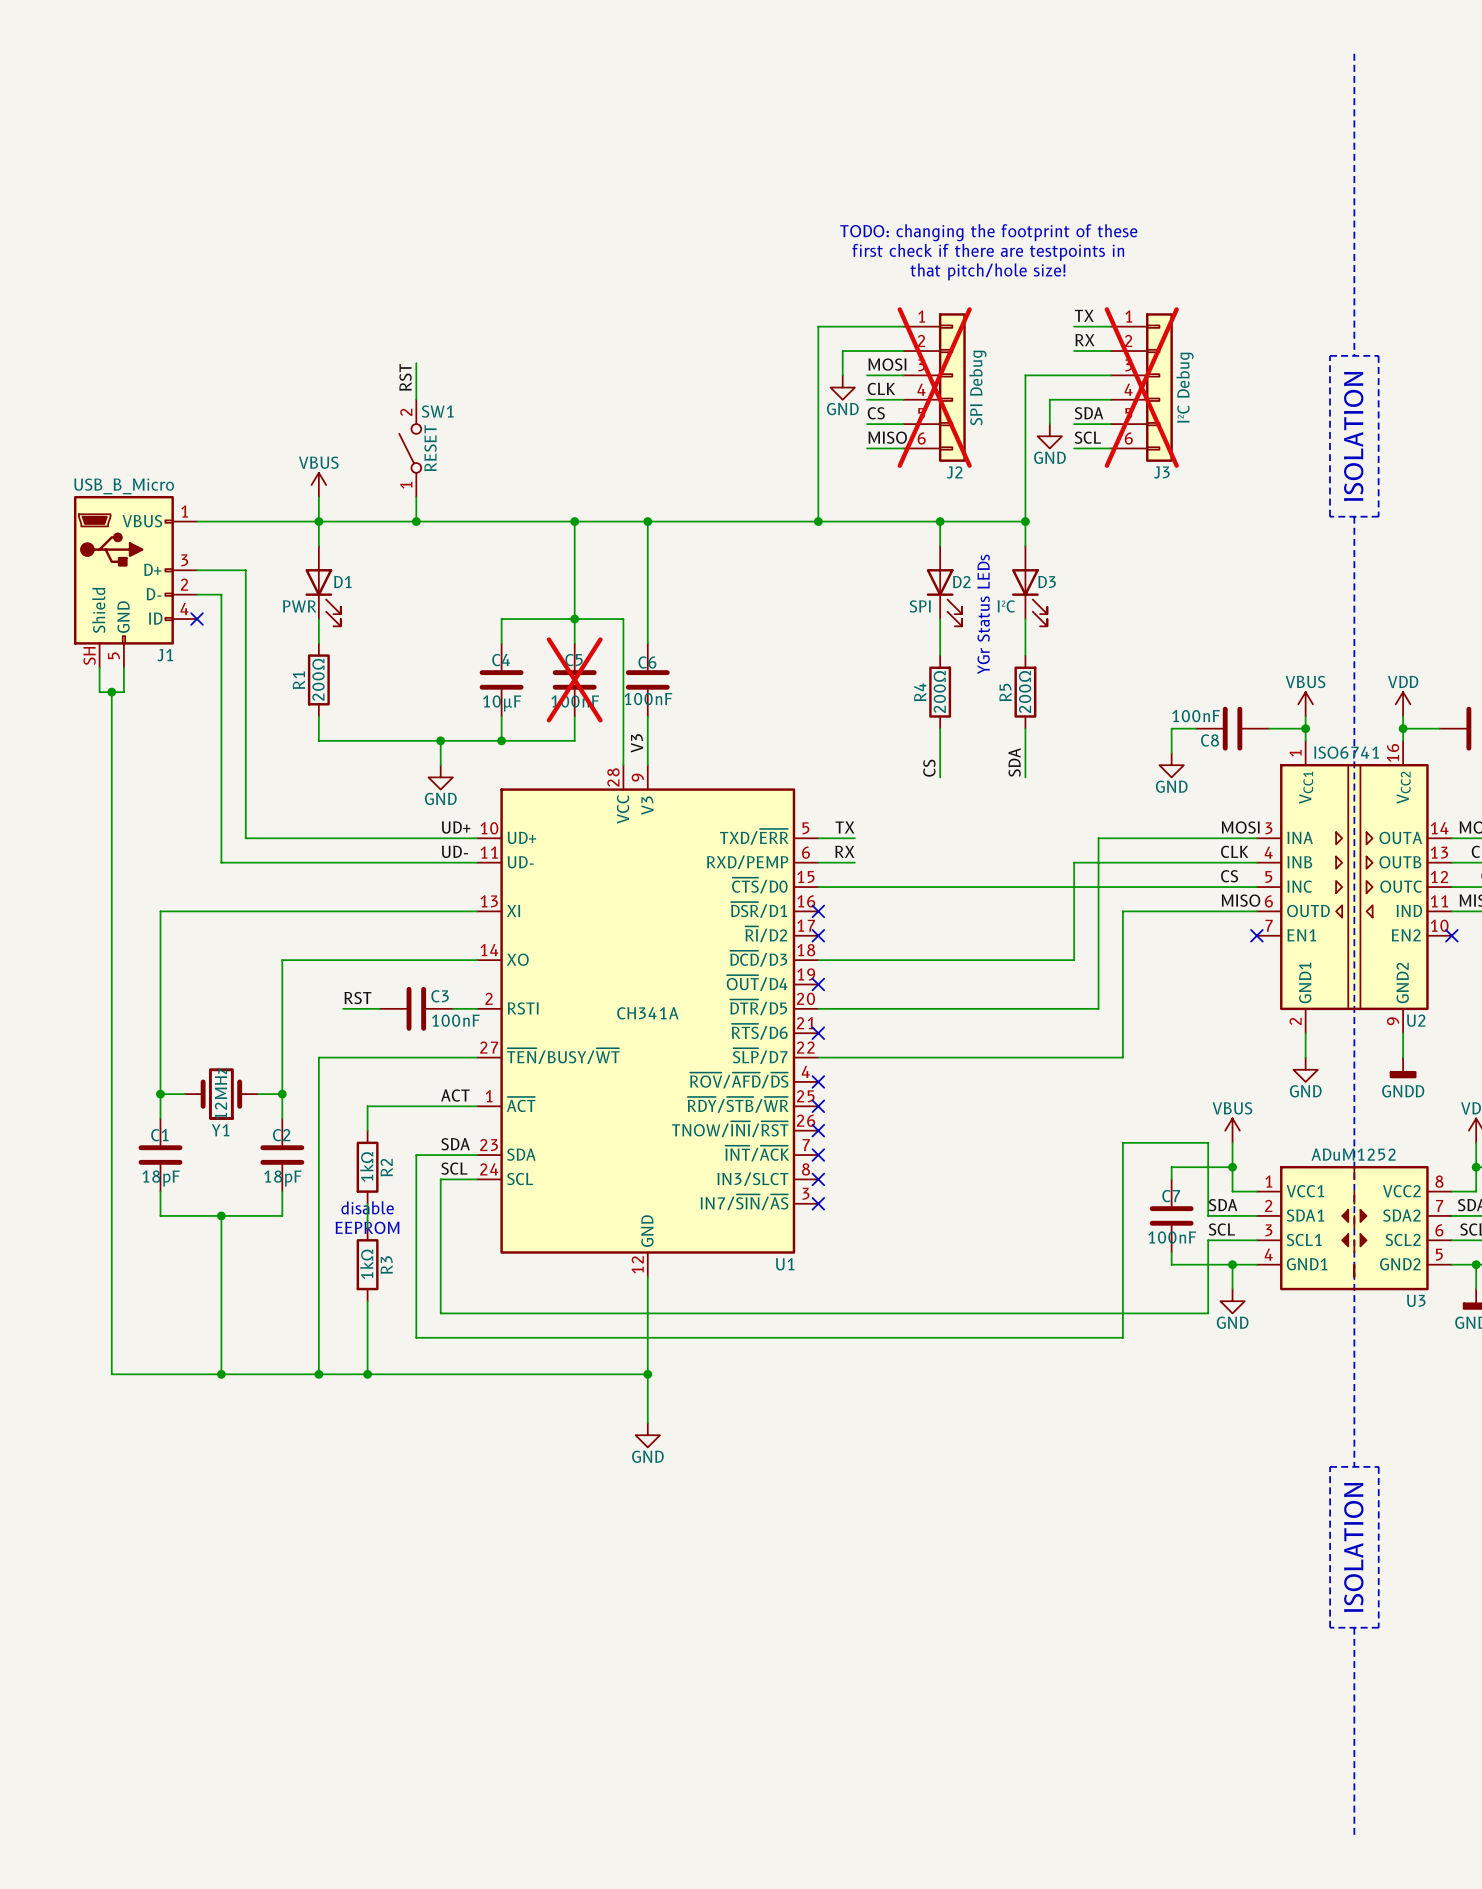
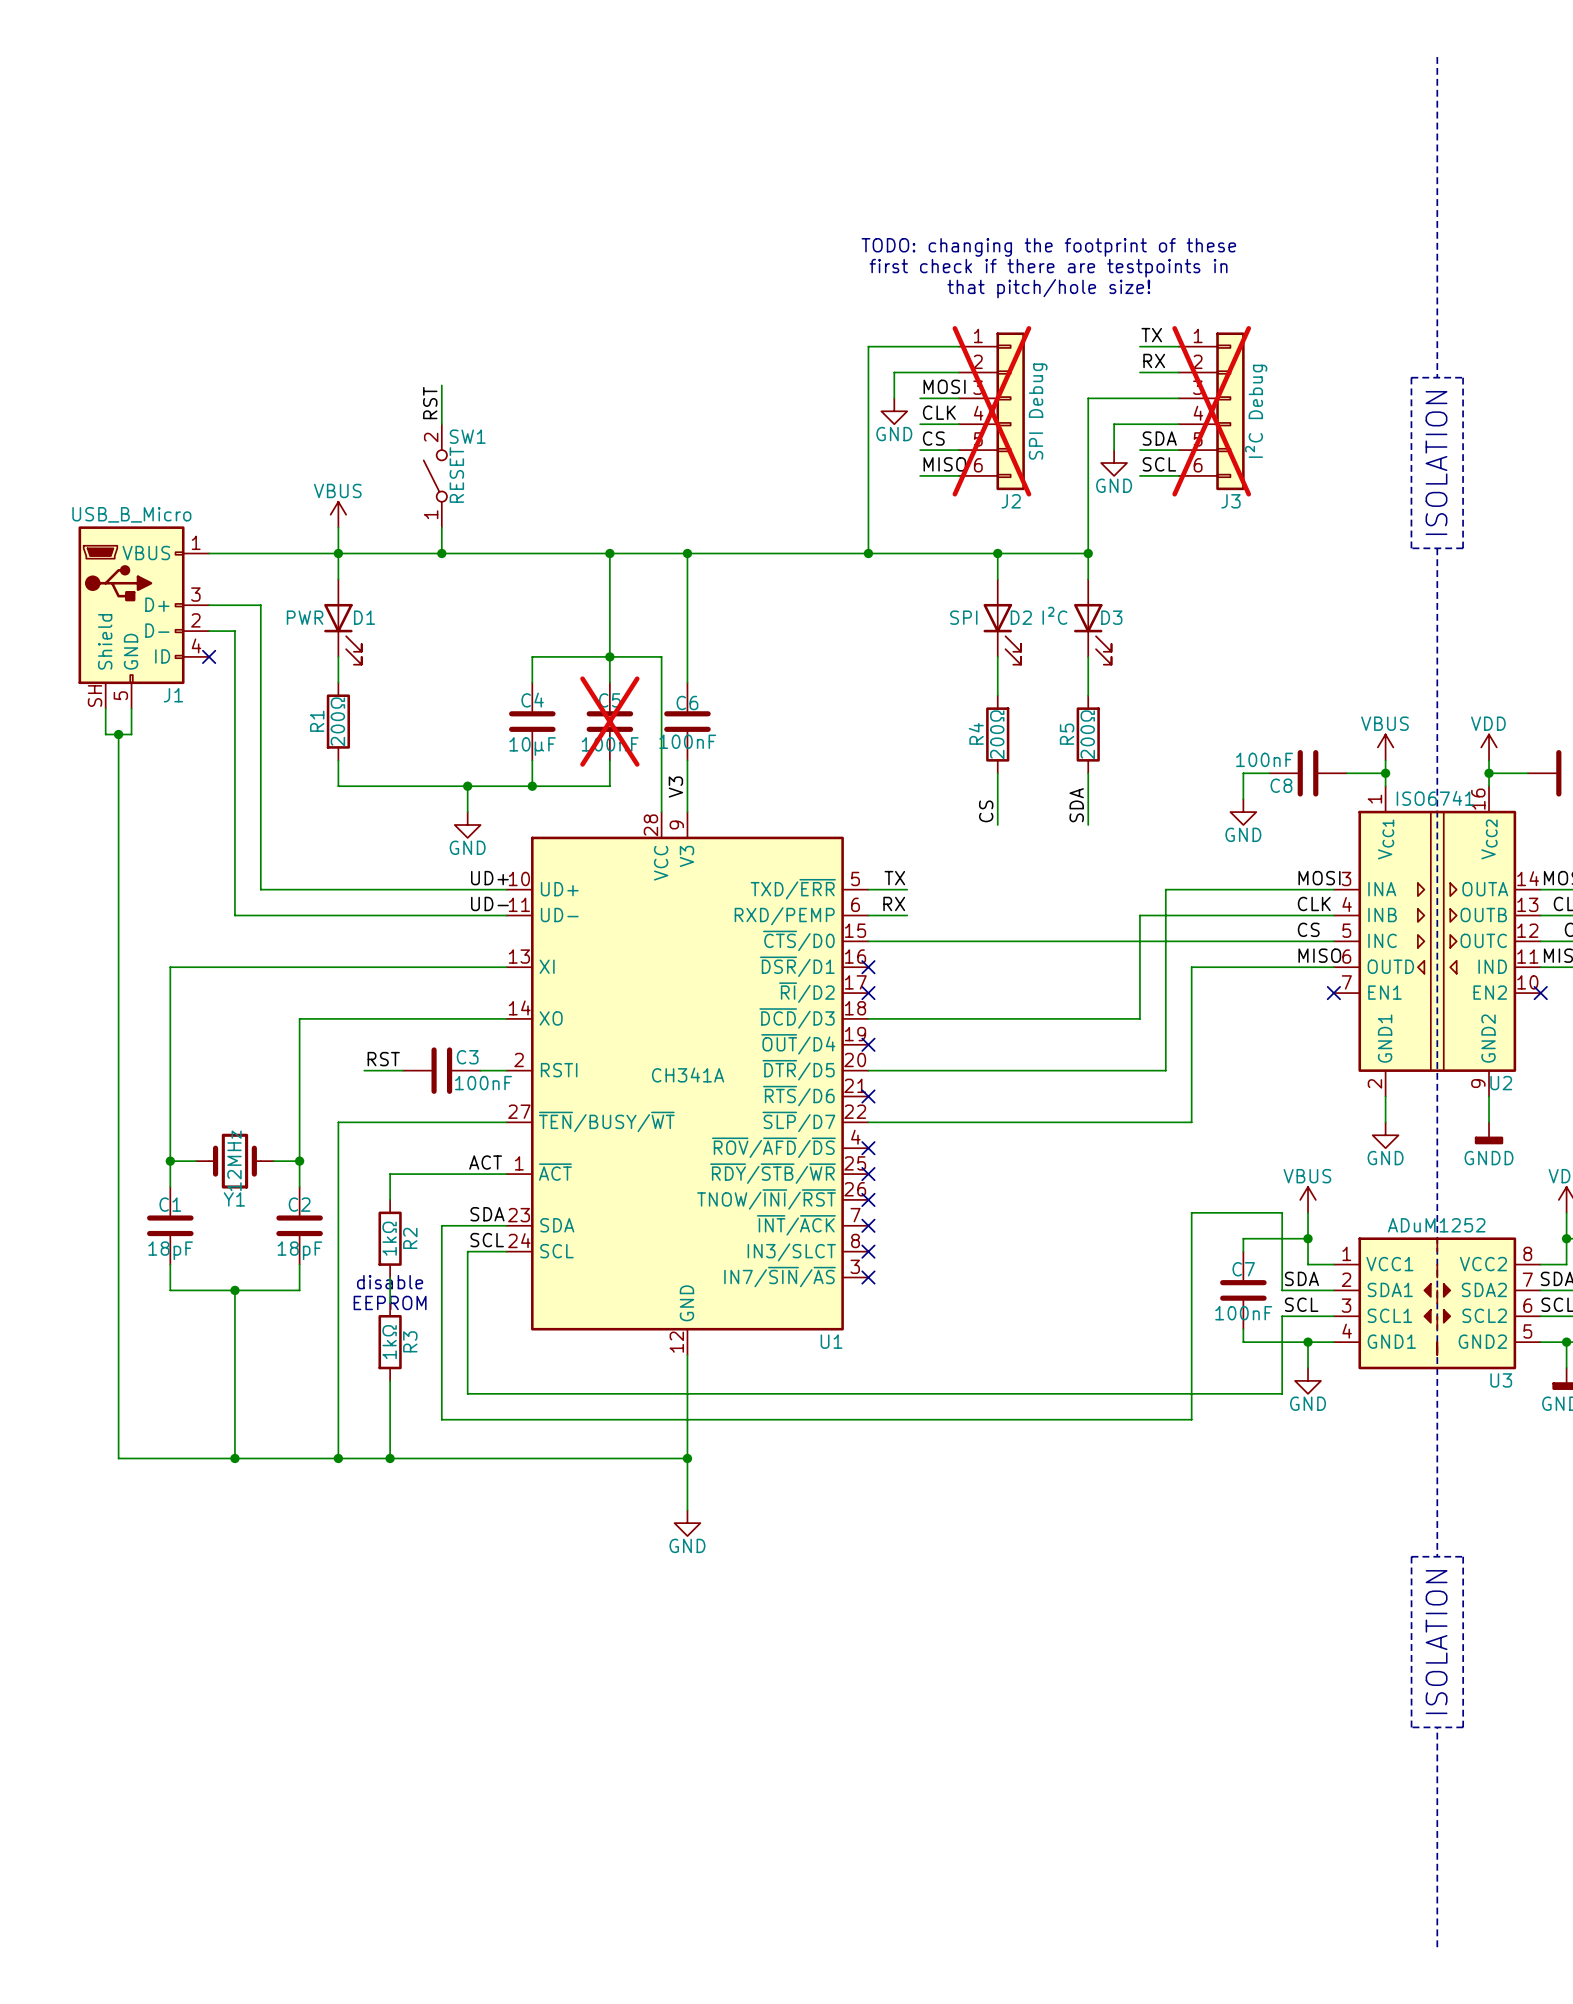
D1 text: none -> PWR (305, 617)
D2 text: none -> SPI (963, 617)
D3 text: none -> I²C (1054, 615)
D1 value: PWR (299, 606) -> none
D2 value: SPI (920, 606) -> none
D3 value: I²C (1006, 606) -> none
text: YGr Status LEDs (983, 614) -> none

